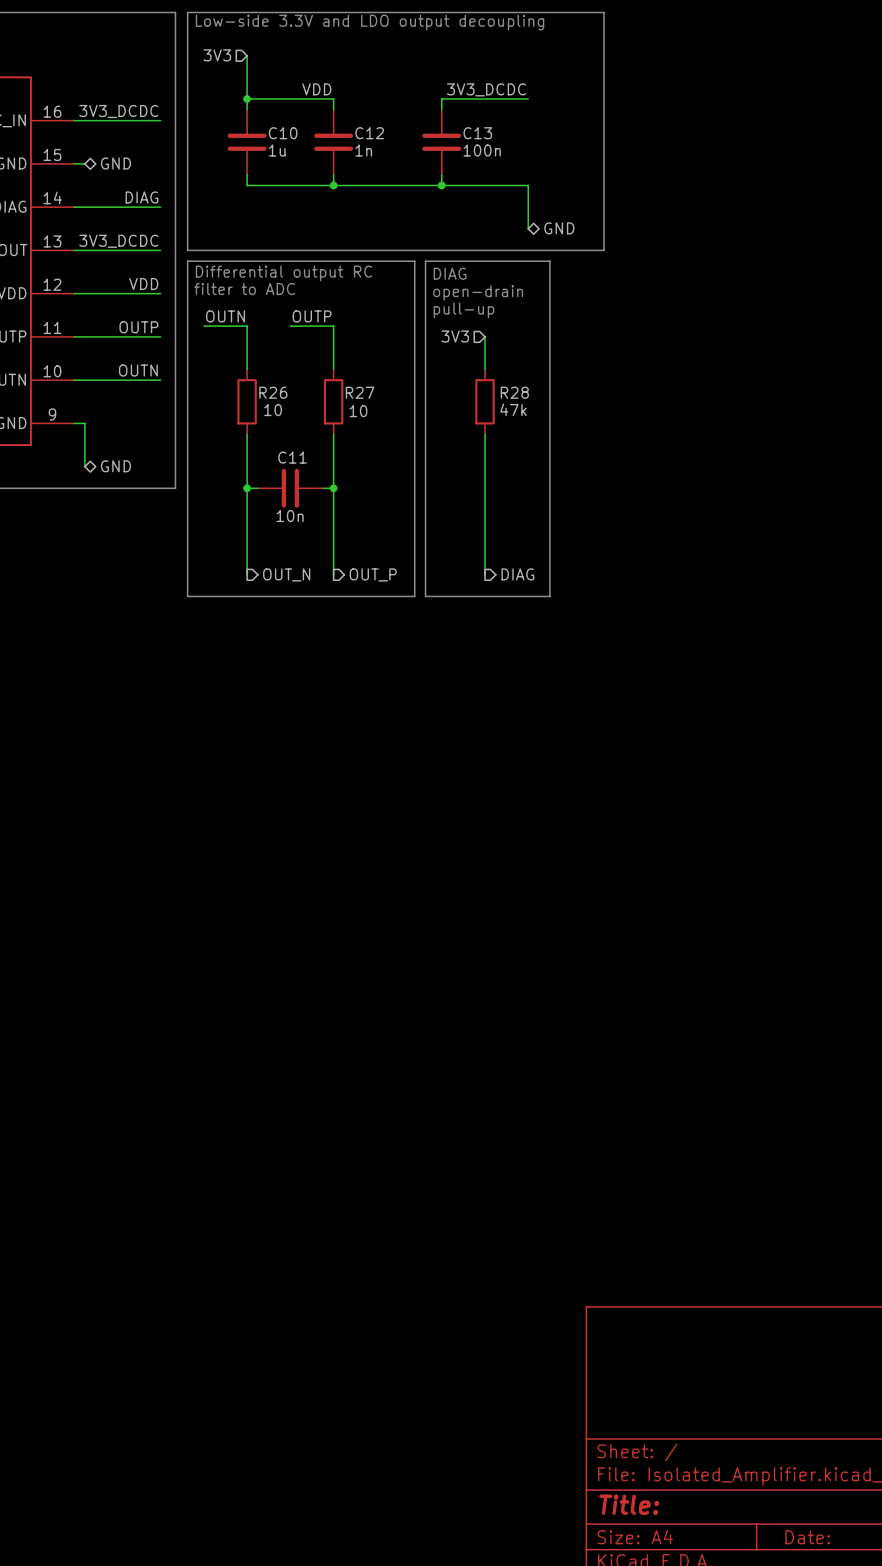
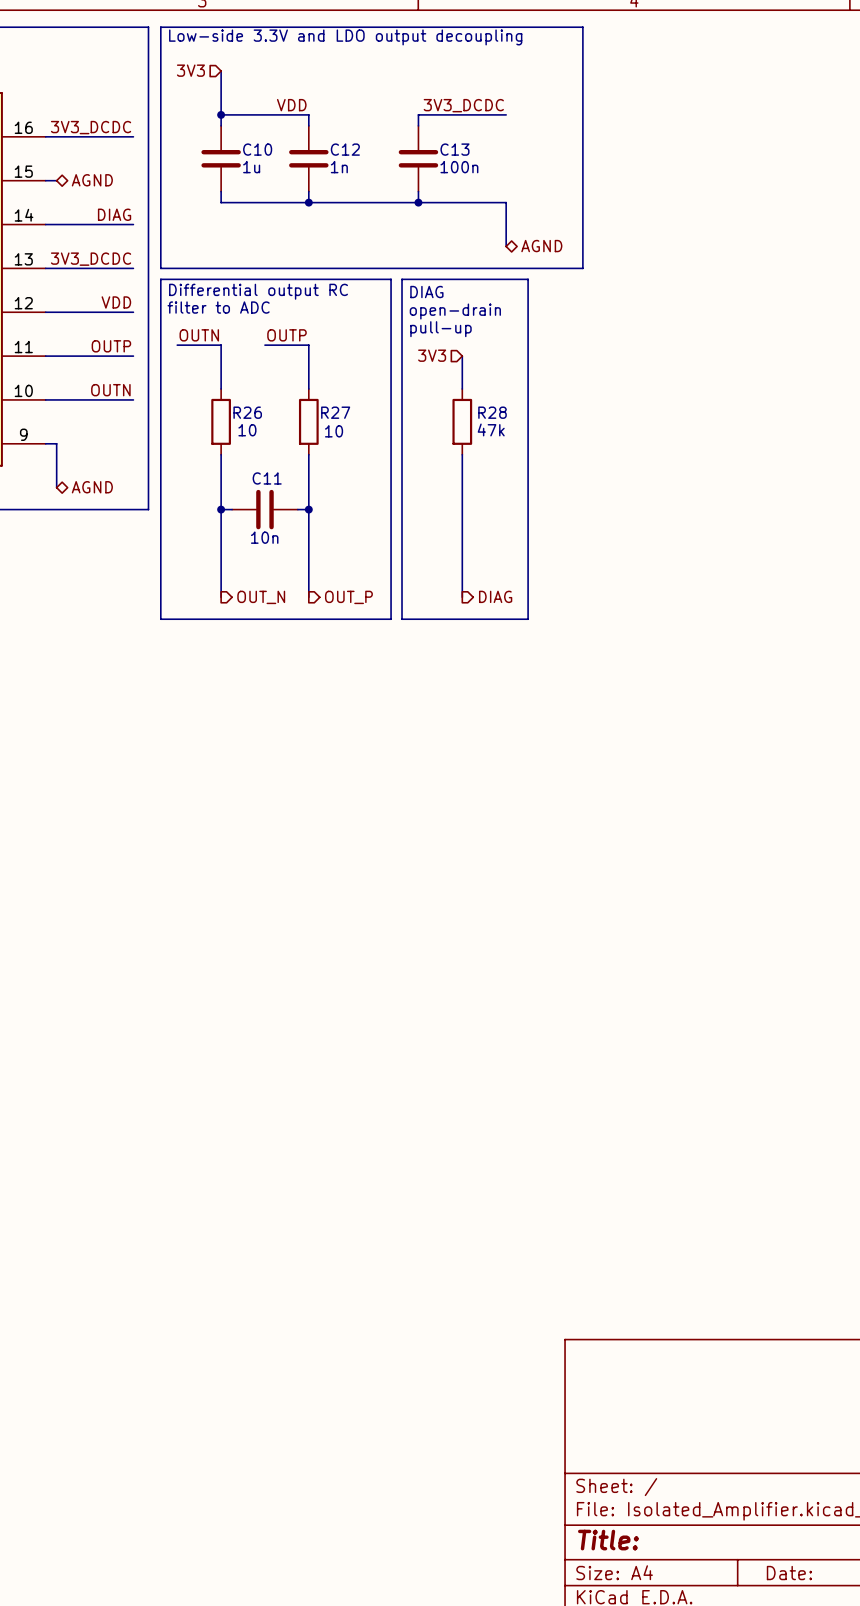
hierarchical label: GND (115, 163) -> AGND (92, 180)
hierarchical label: GND (559, 228) -> AGND (541, 246)
hierarchical label: GND (115, 466) -> AGND (92, 487)

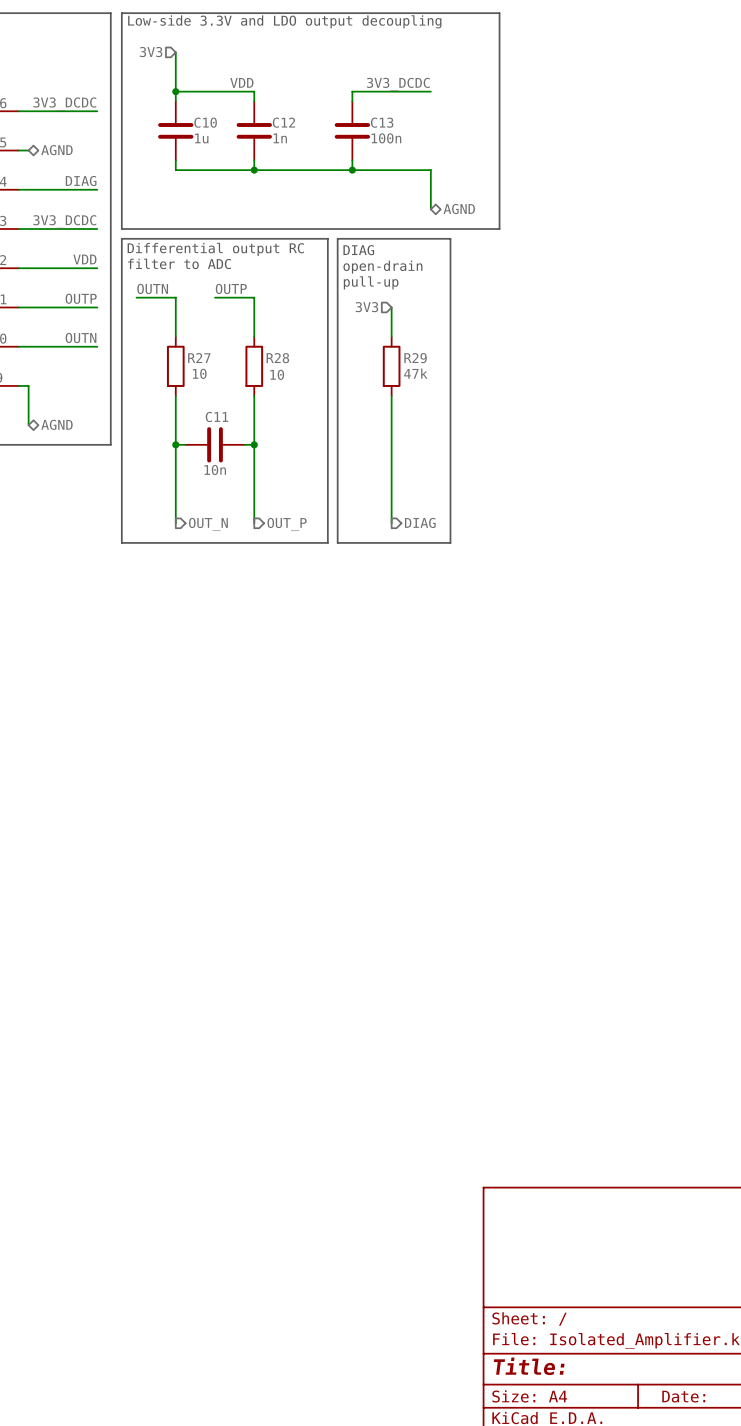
R26 name: R26 (247, 412) -> R27 (199, 358)
R27 name: R27 (335, 412) -> R28 (277, 358)
R28 name: R28 (492, 412) -> R29 (415, 358)

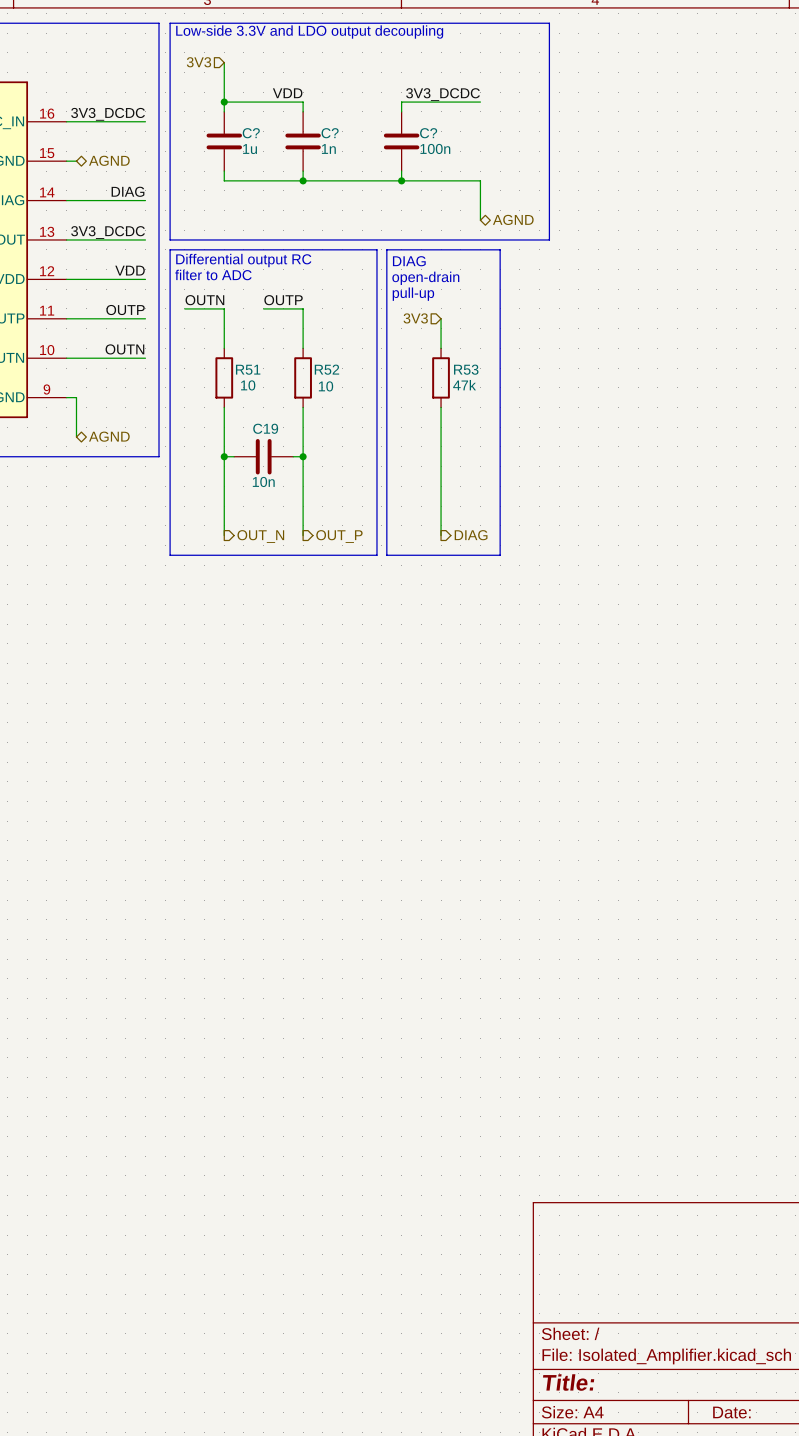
C10 name: C10 (205, 122) -> C? (251, 133)
C12 name: C12 (283, 122) -> C? (330, 133)
C13 name: C13 (382, 122) -> C? (428, 133)
R27 name: R27 (199, 358) -> R51 (248, 369)
R28 name: R28 (277, 358) -> R52 (326, 369)
R29 name: R29 (415, 358) -> R53 (466, 369)
C11 name: C11 (216, 417) -> C19 (265, 428)

